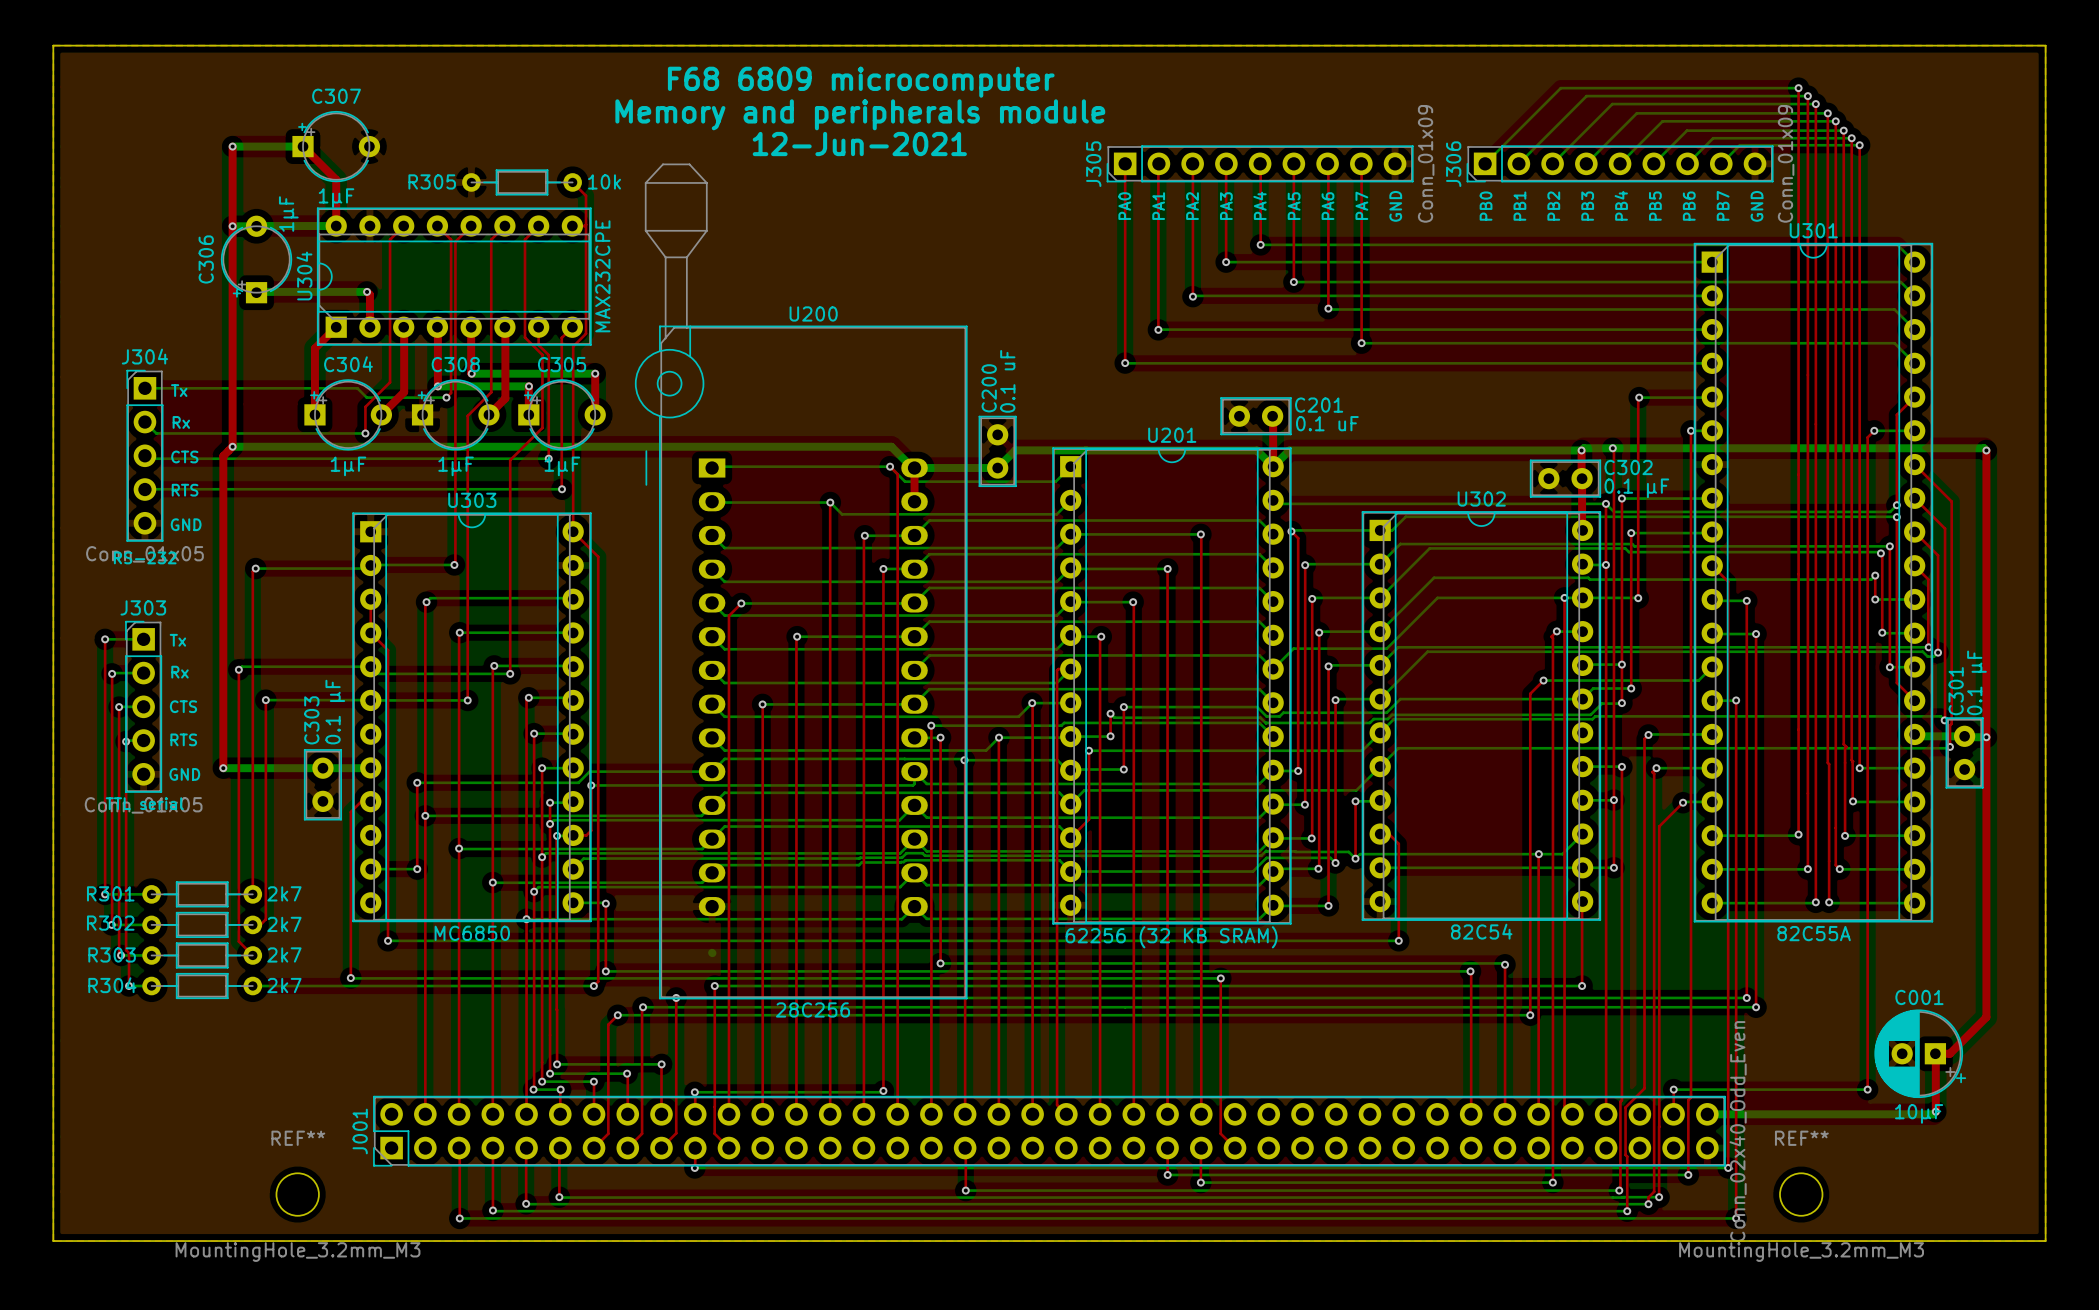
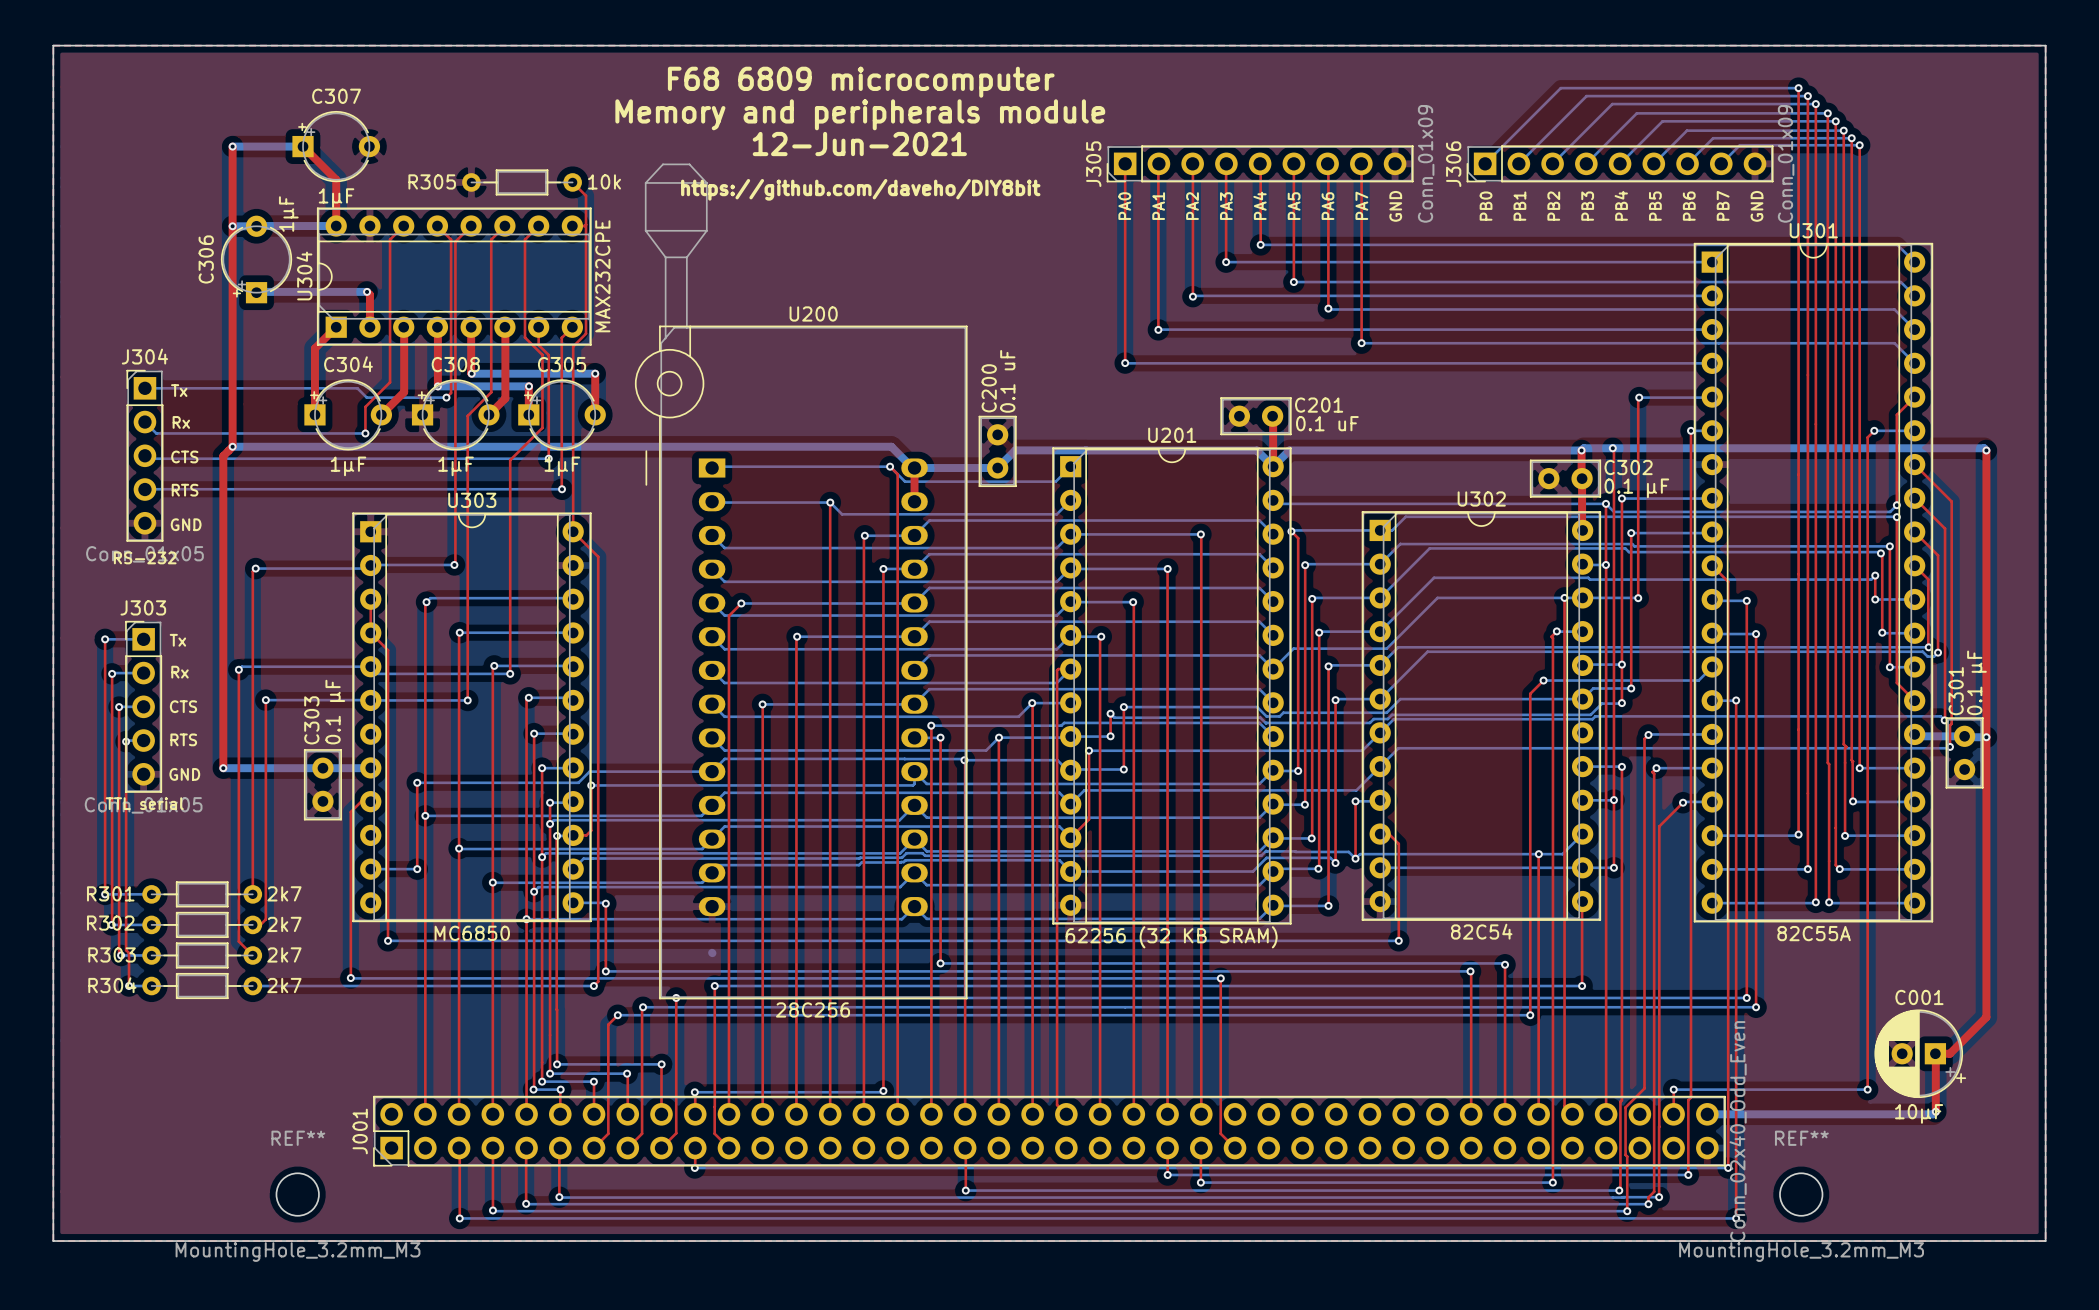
text: none -> https://github.com/daveho/DIY8bit (860, 189)

